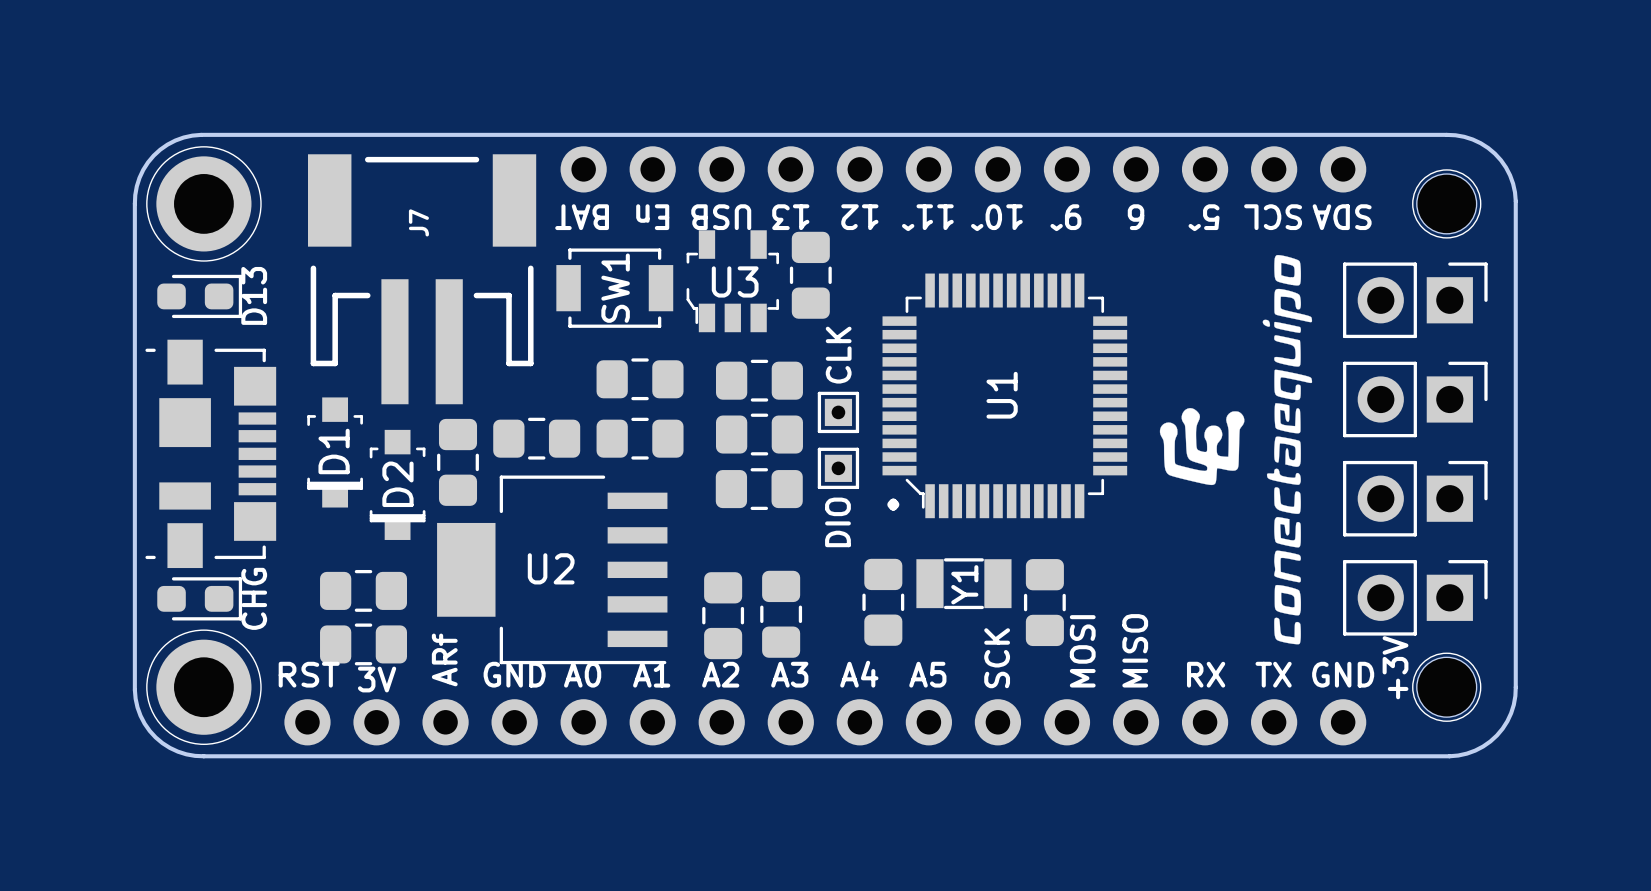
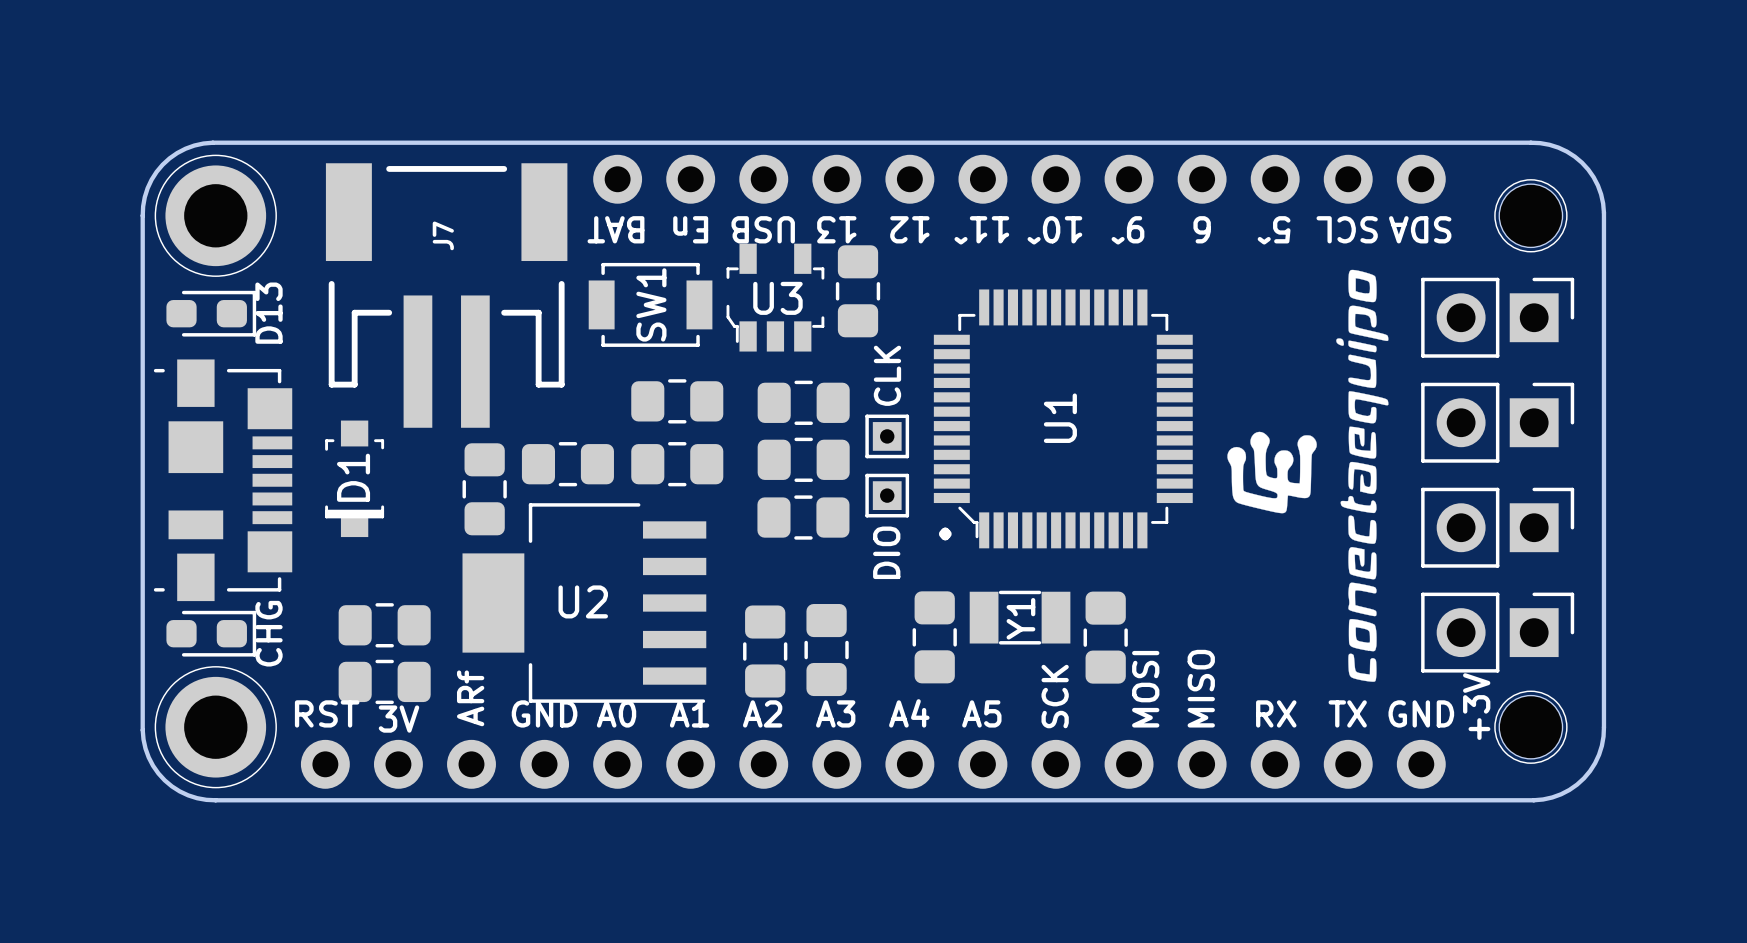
D2: (397, 484) -> none

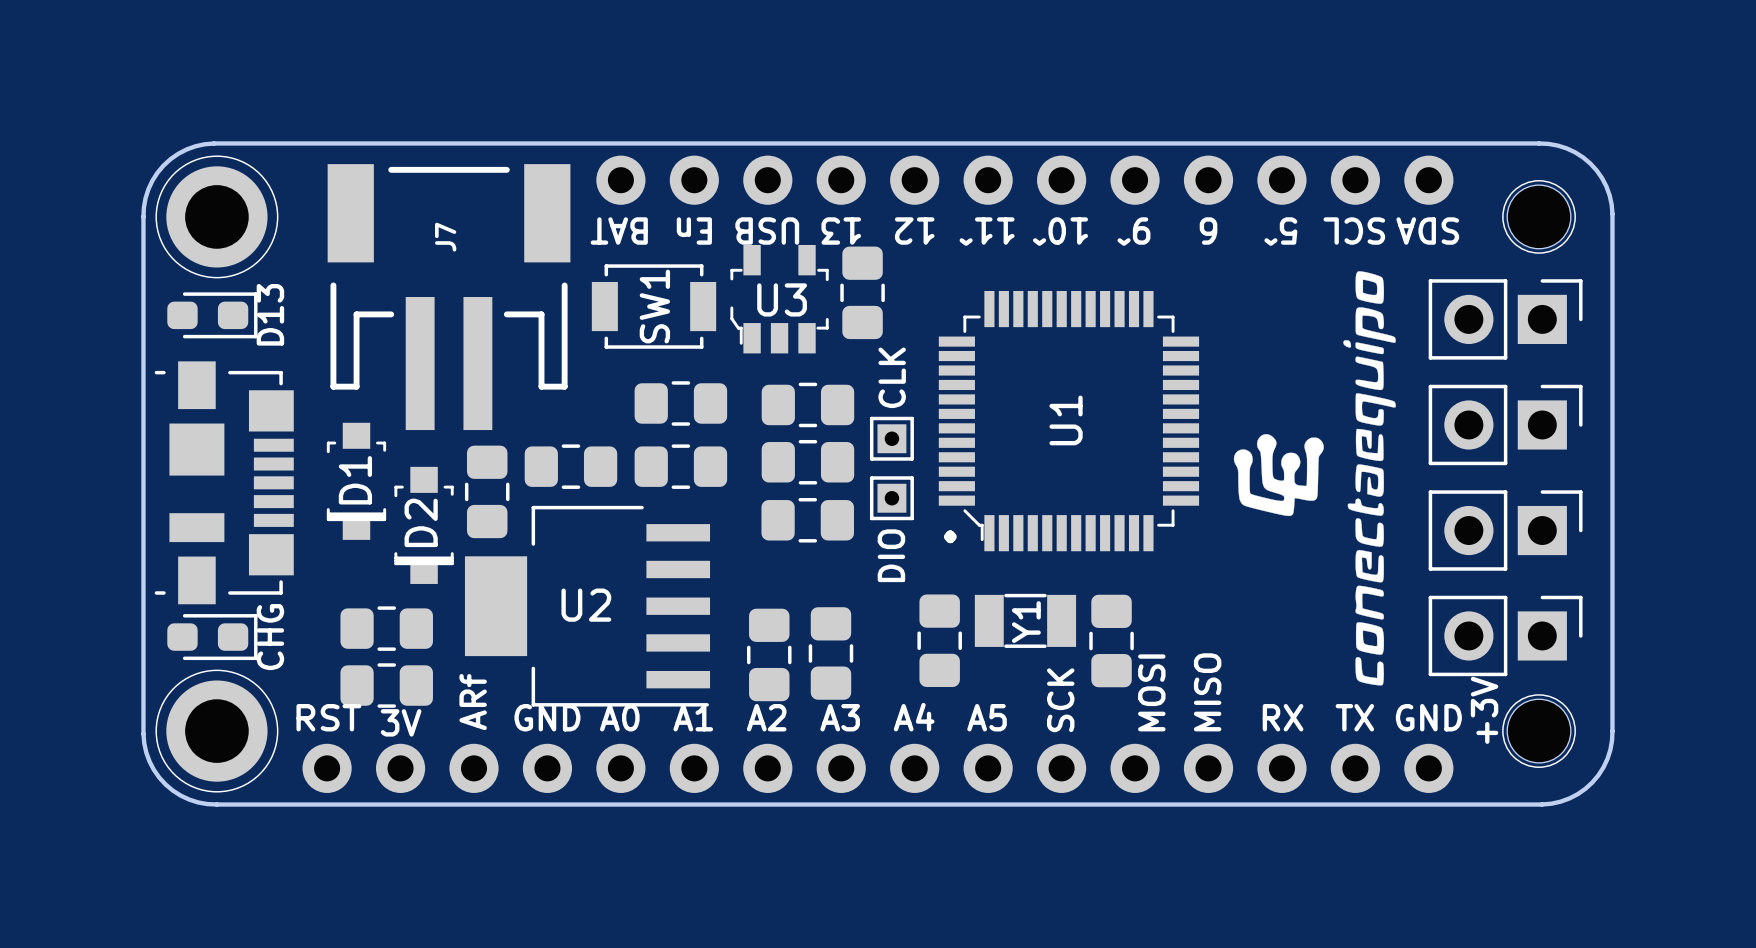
D2: none -> (424, 525)

